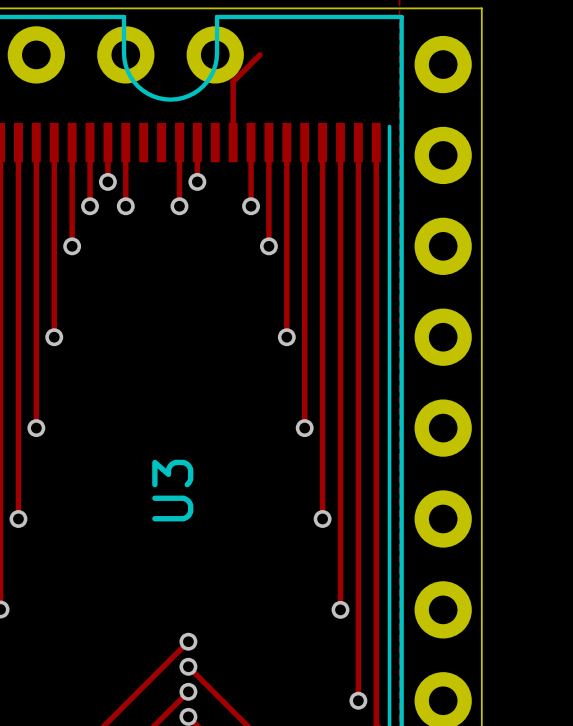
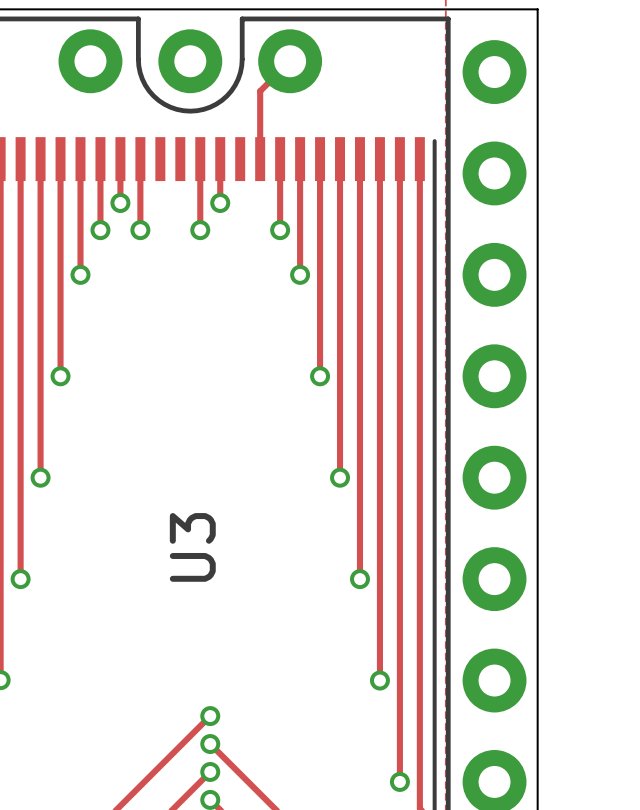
part position: (125, 54) -> (190, 61)

